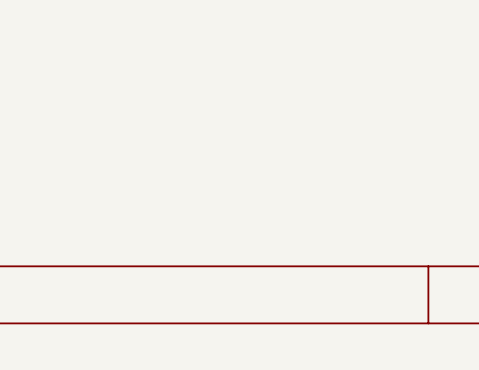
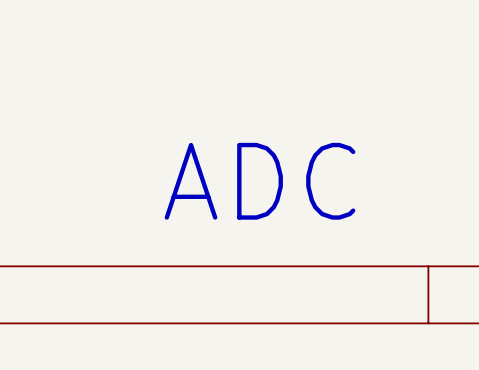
text: none -> ADC (260, 181)

